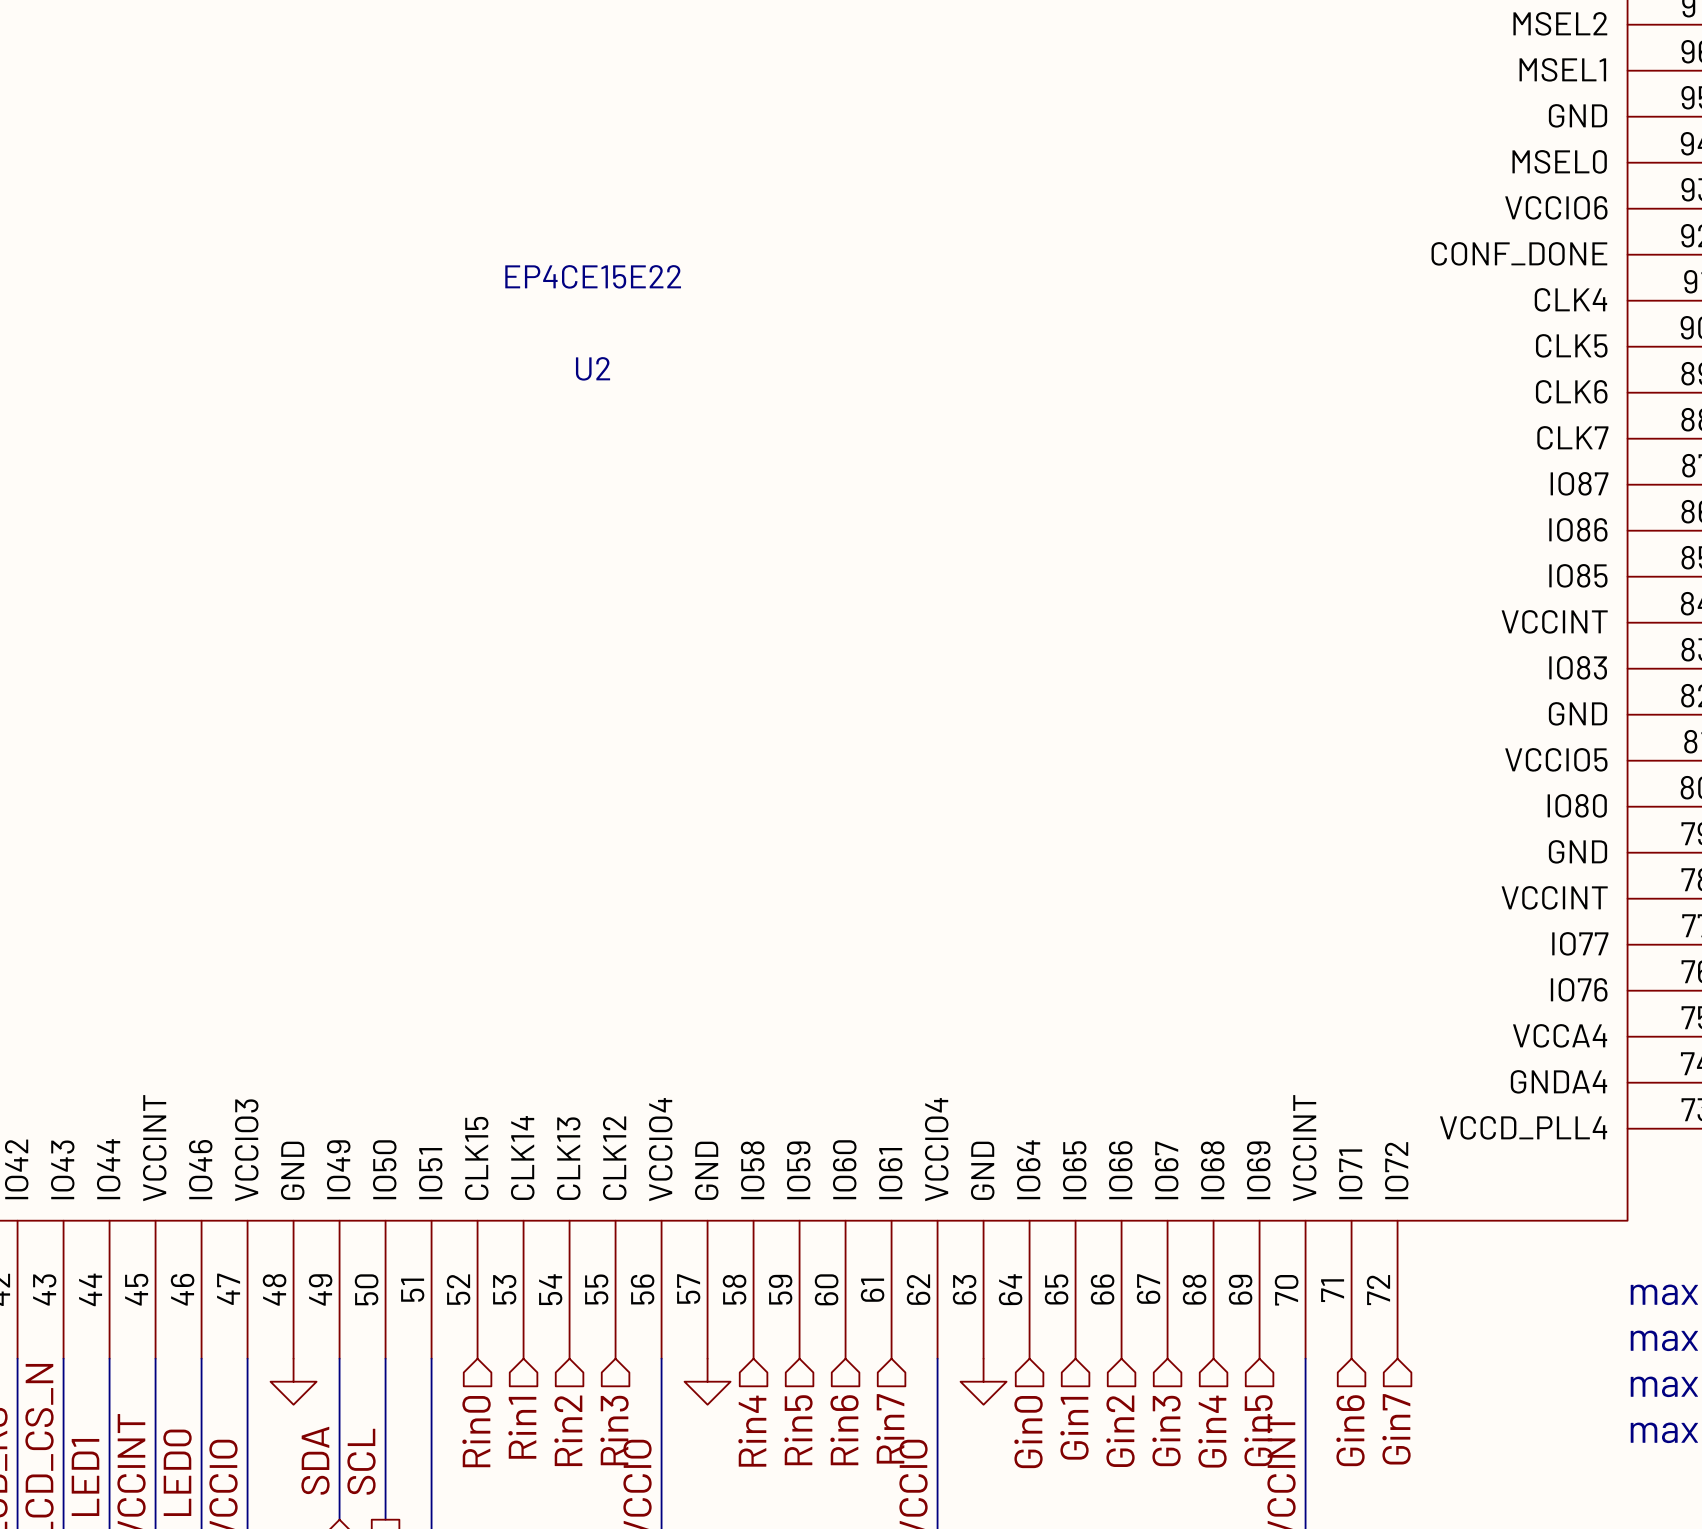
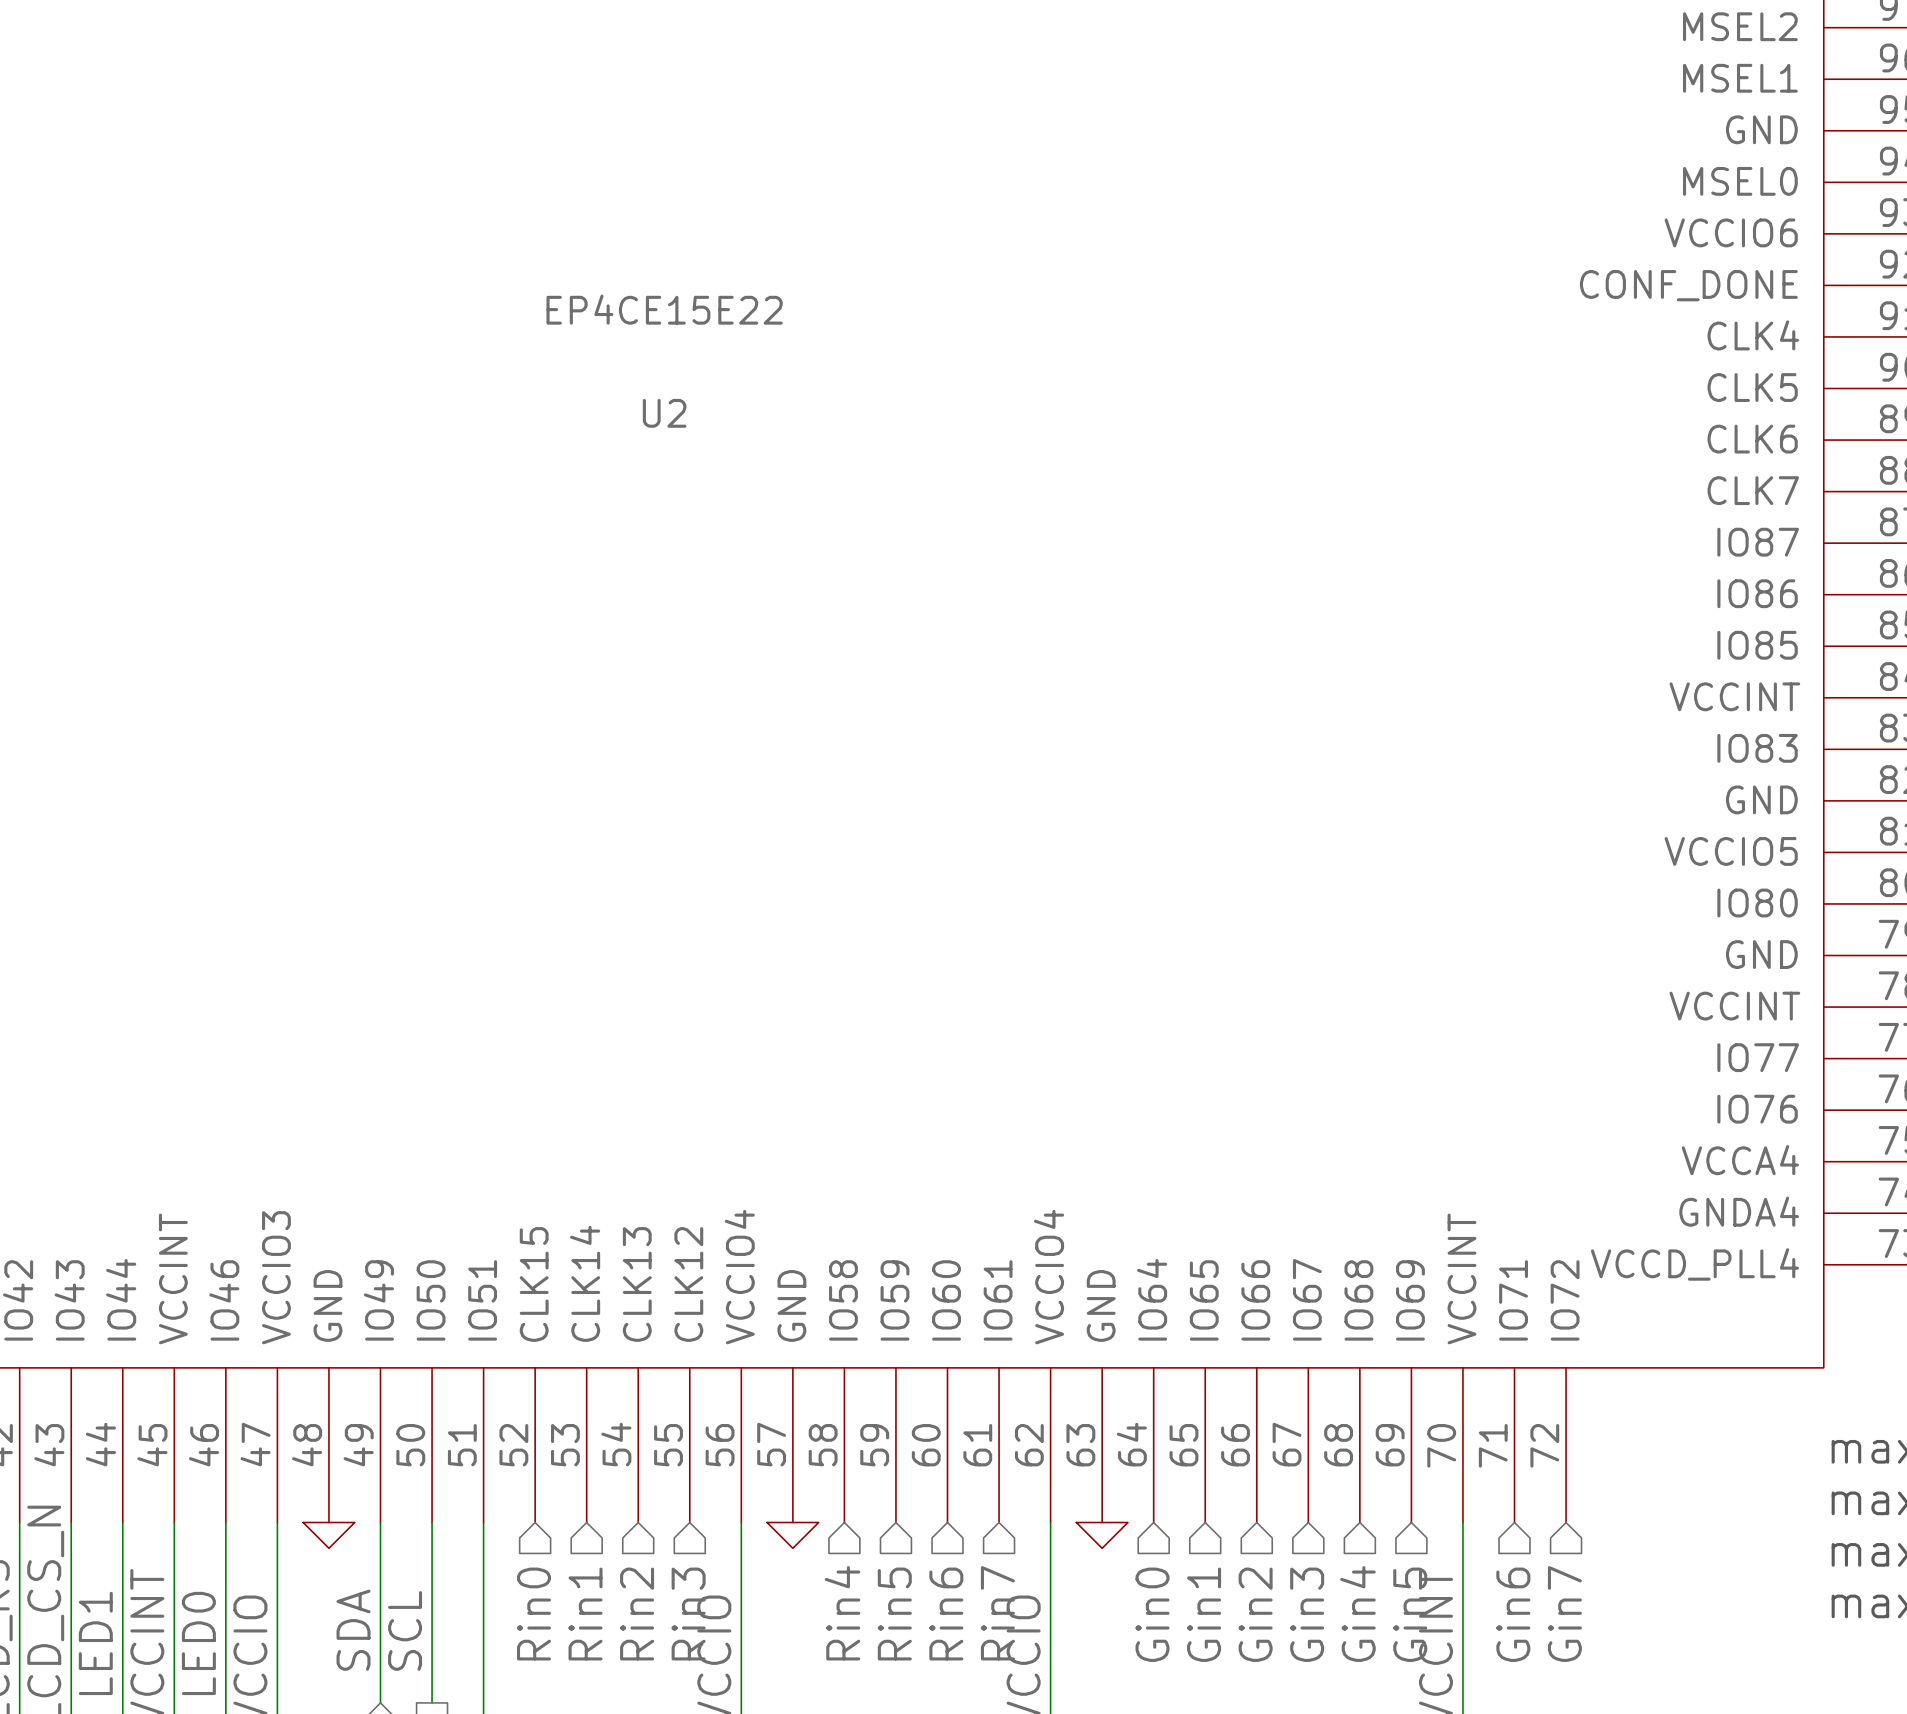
power symbol shape: [270, 1358, 317, 1405] -> [303, 1522, 355, 1549]
power symbol shape: [684, 1358, 731, 1405] -> [767, 1522, 819, 1549]
power symbol shape: [960, 1358, 1007, 1405] -> [1076, 1522, 1128, 1549]

